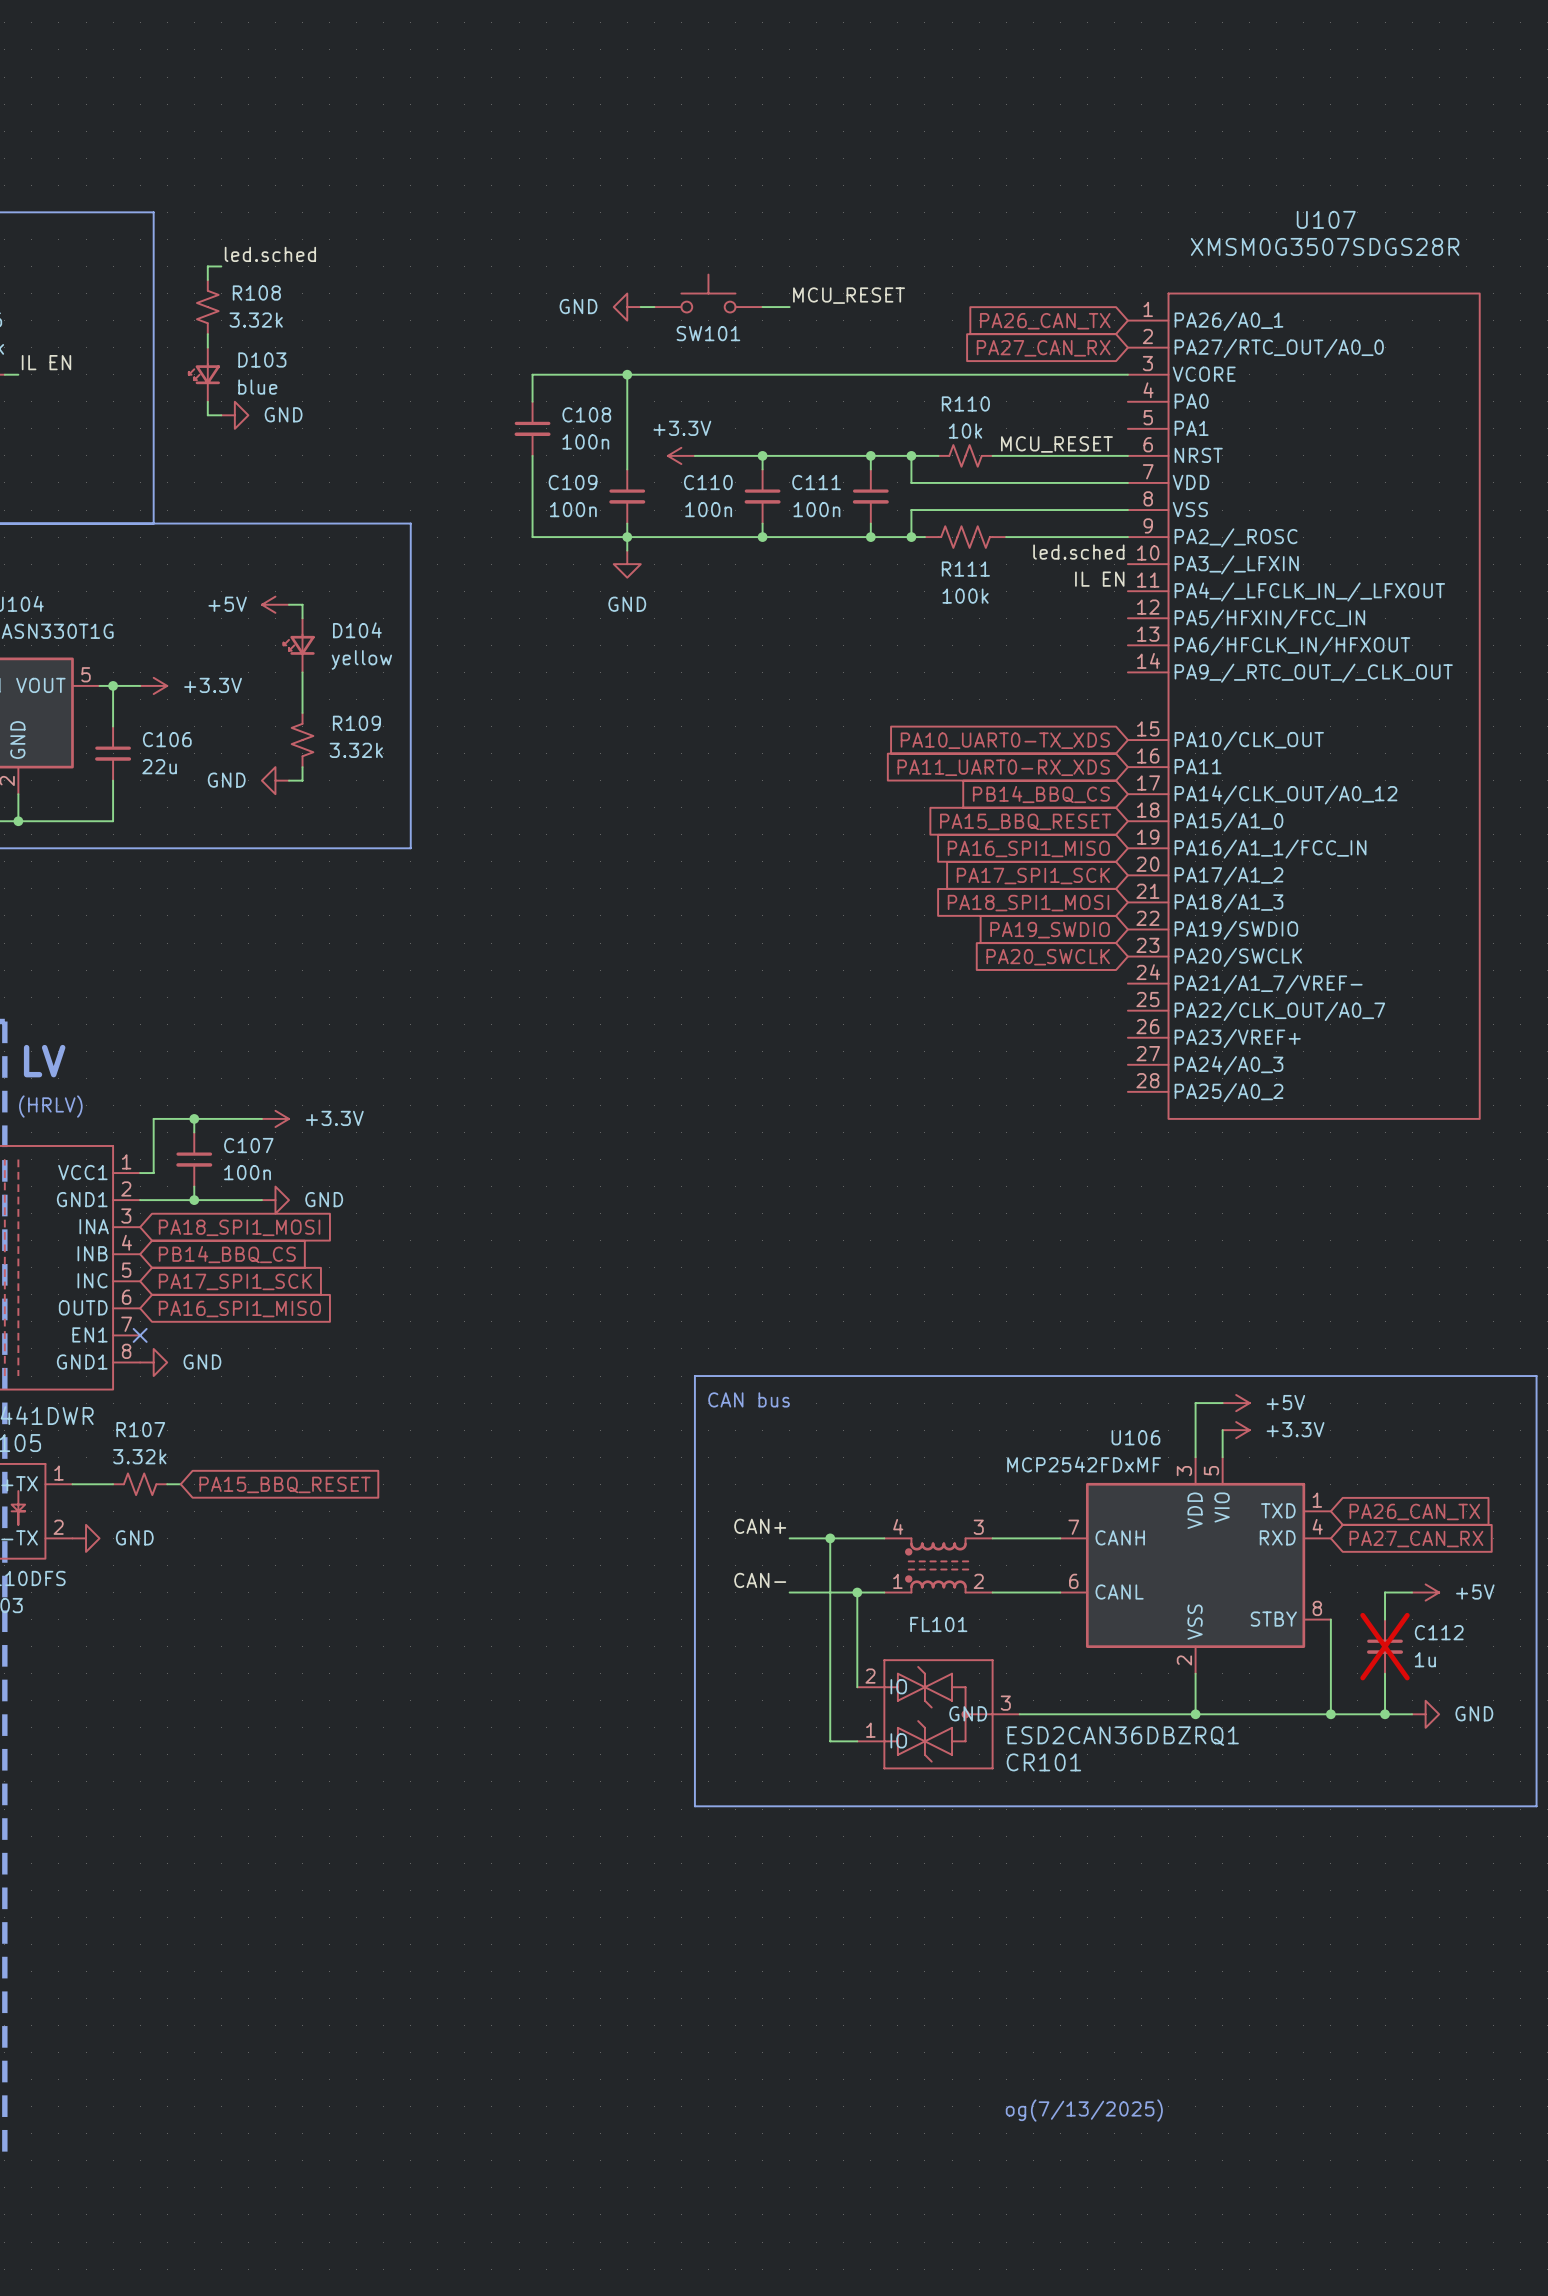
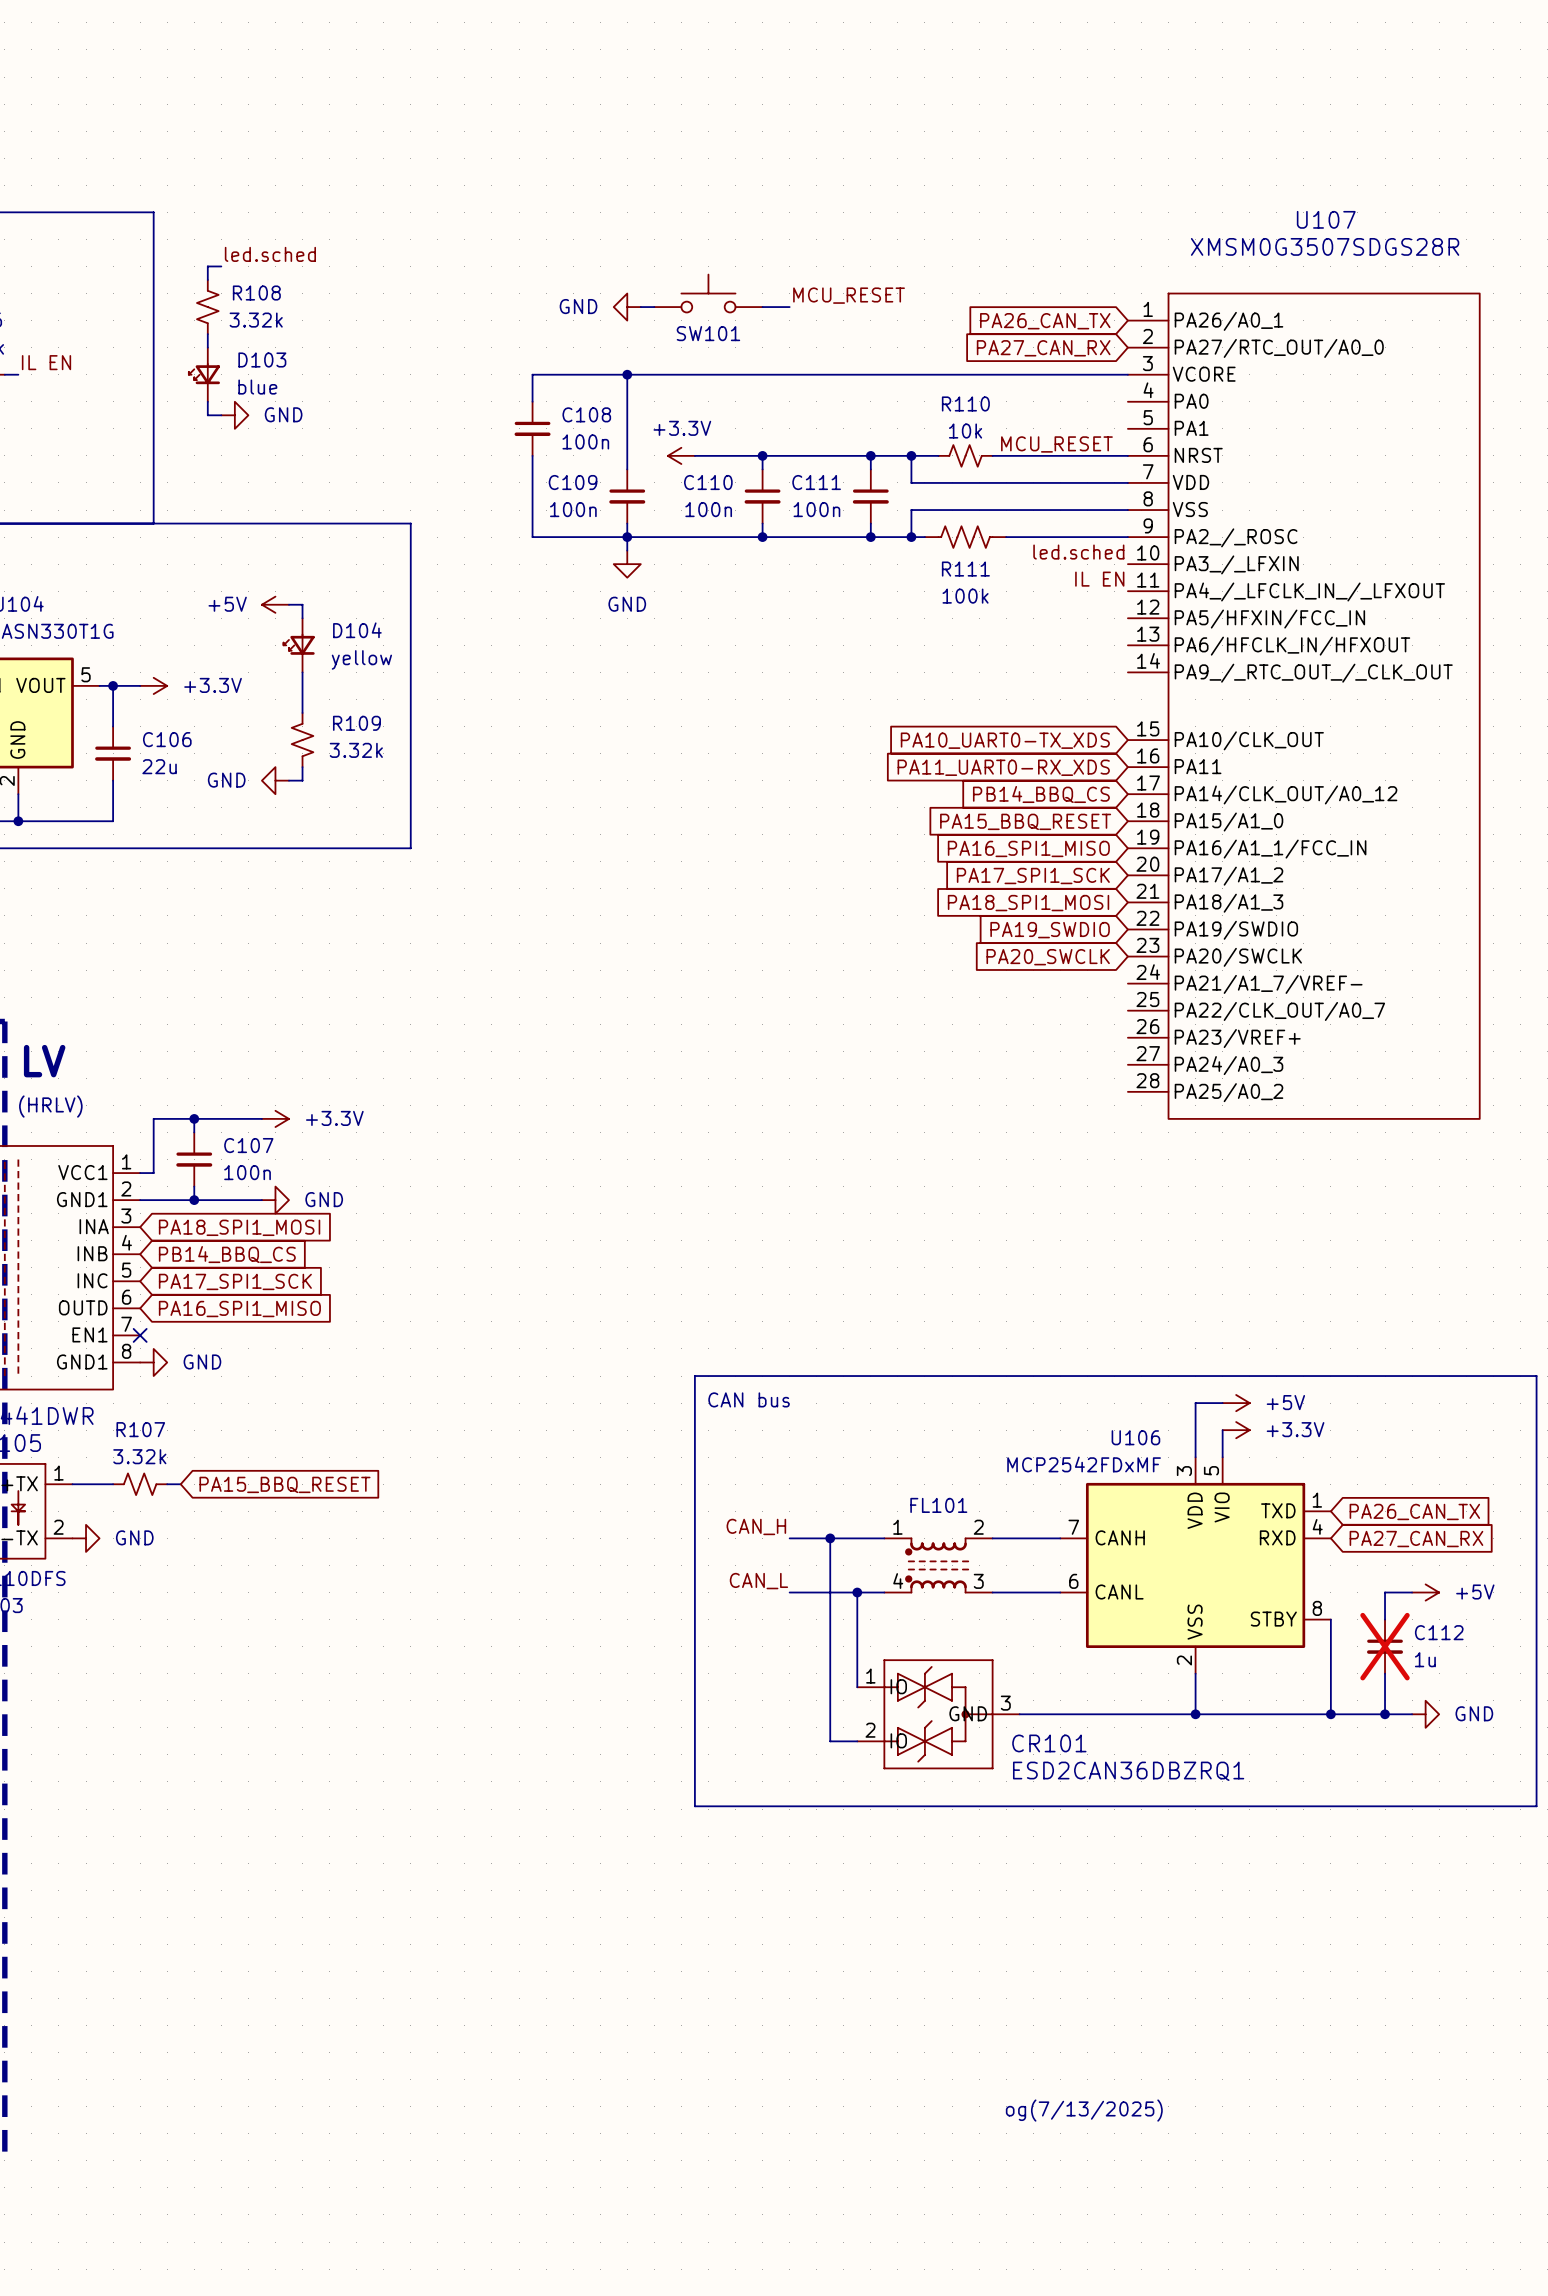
label: CAN+ (760, 1526) -> CAN_H (756, 1526)
FL101 flip: as is (937, 1565) -> up-down (937, 1565)
label: CAN- (760, 1580) -> CAN_L (758, 1581)
CR101 flip: as is (938, 1714) -> up-down (938, 1714)
CR101 value position: ESD2CAN36DBZRQ1 (1123, 1736) -> ESD2CAN36DBZRQ1 (1128, 1771)

